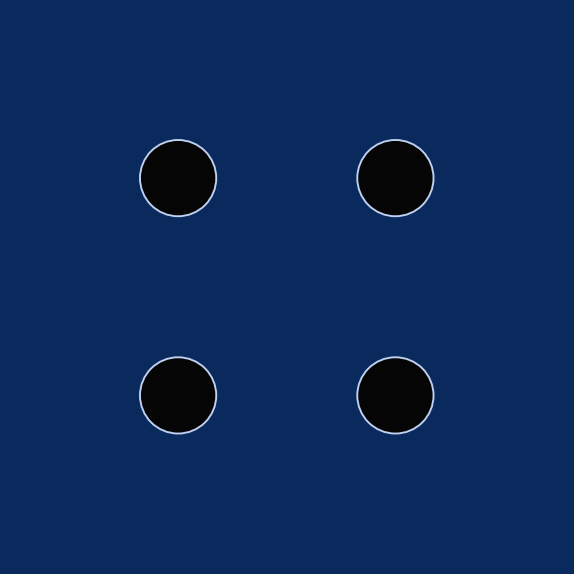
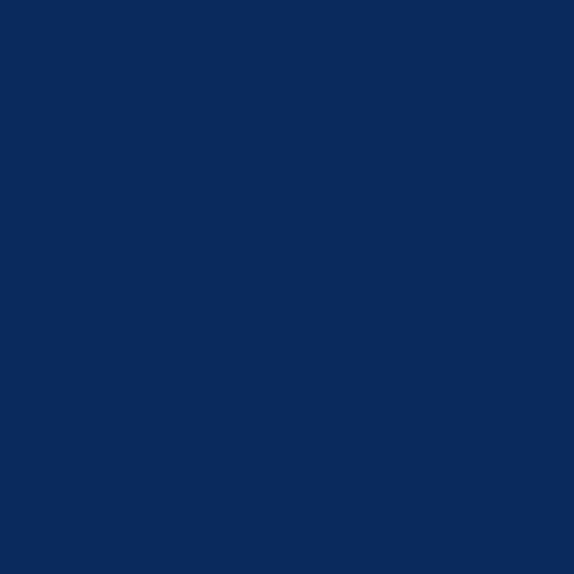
part: (178, 178) -> none
part: (395, 178) -> none
part: (178, 395) -> none
part: (395, 395) -> none

